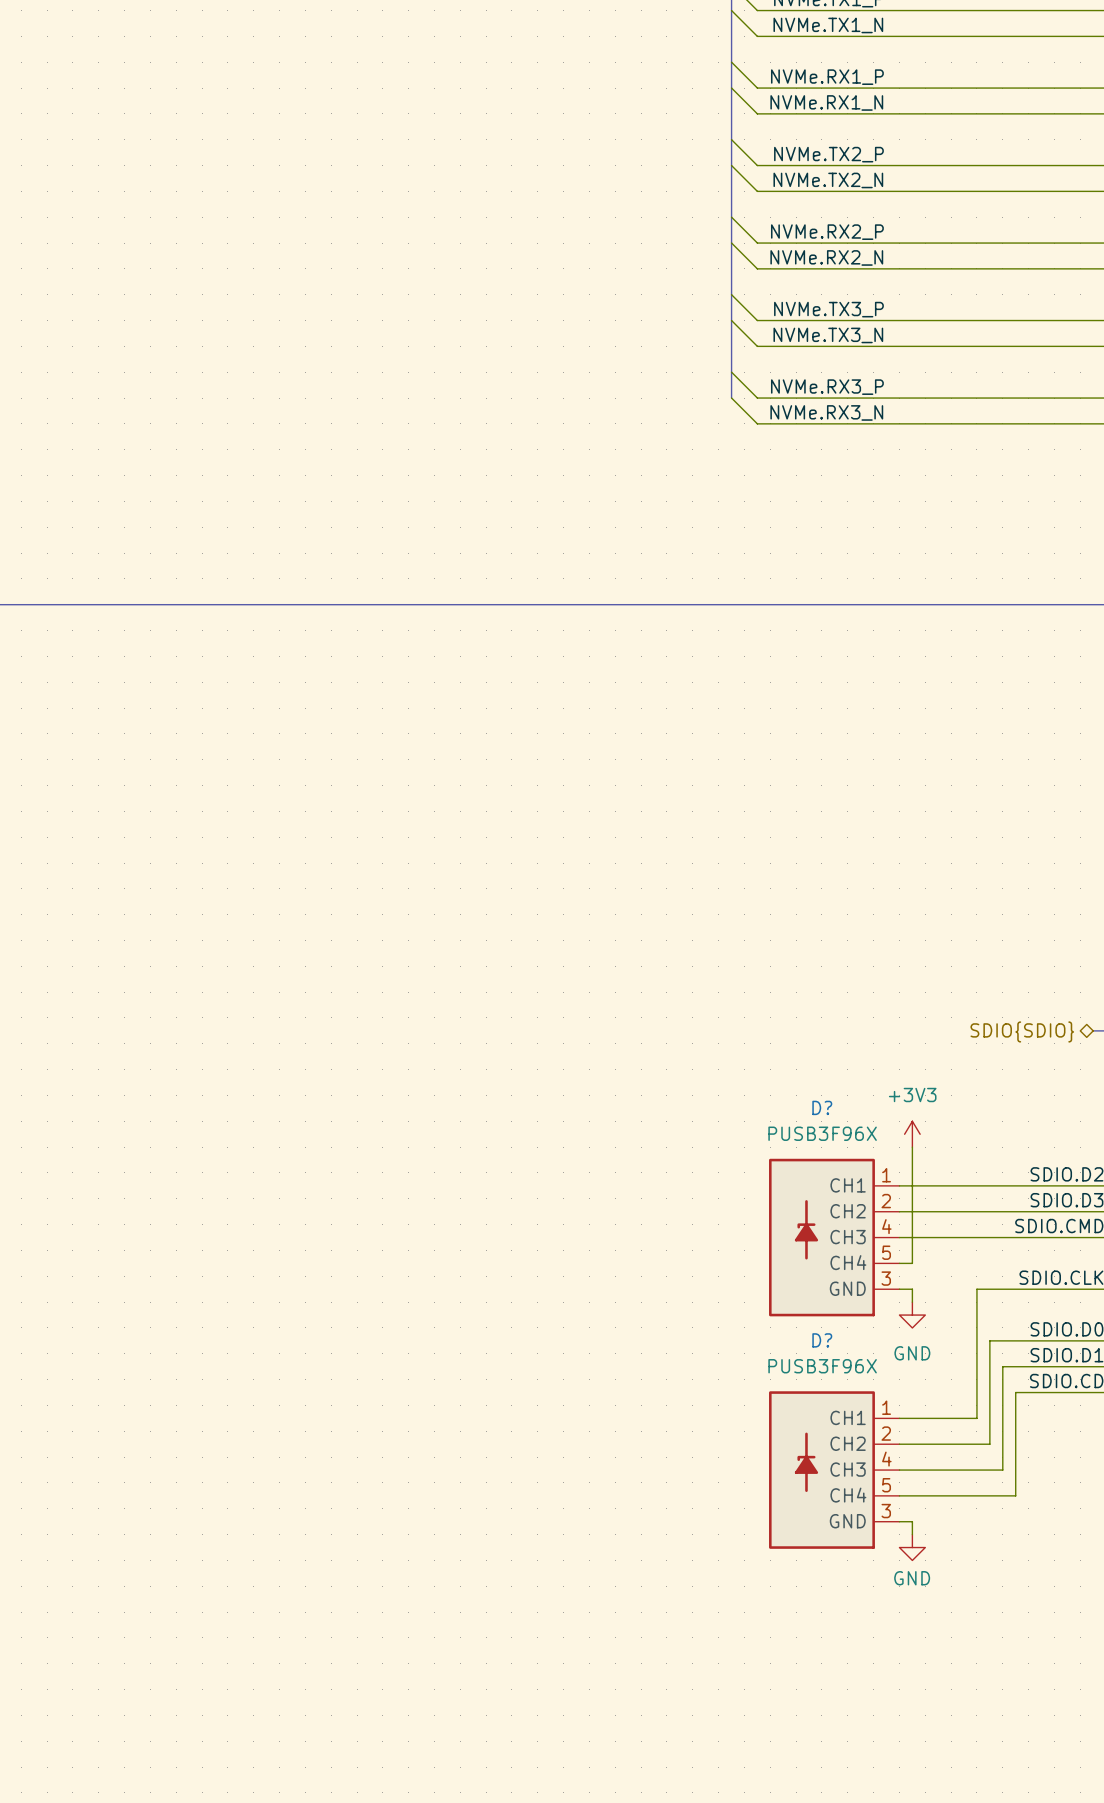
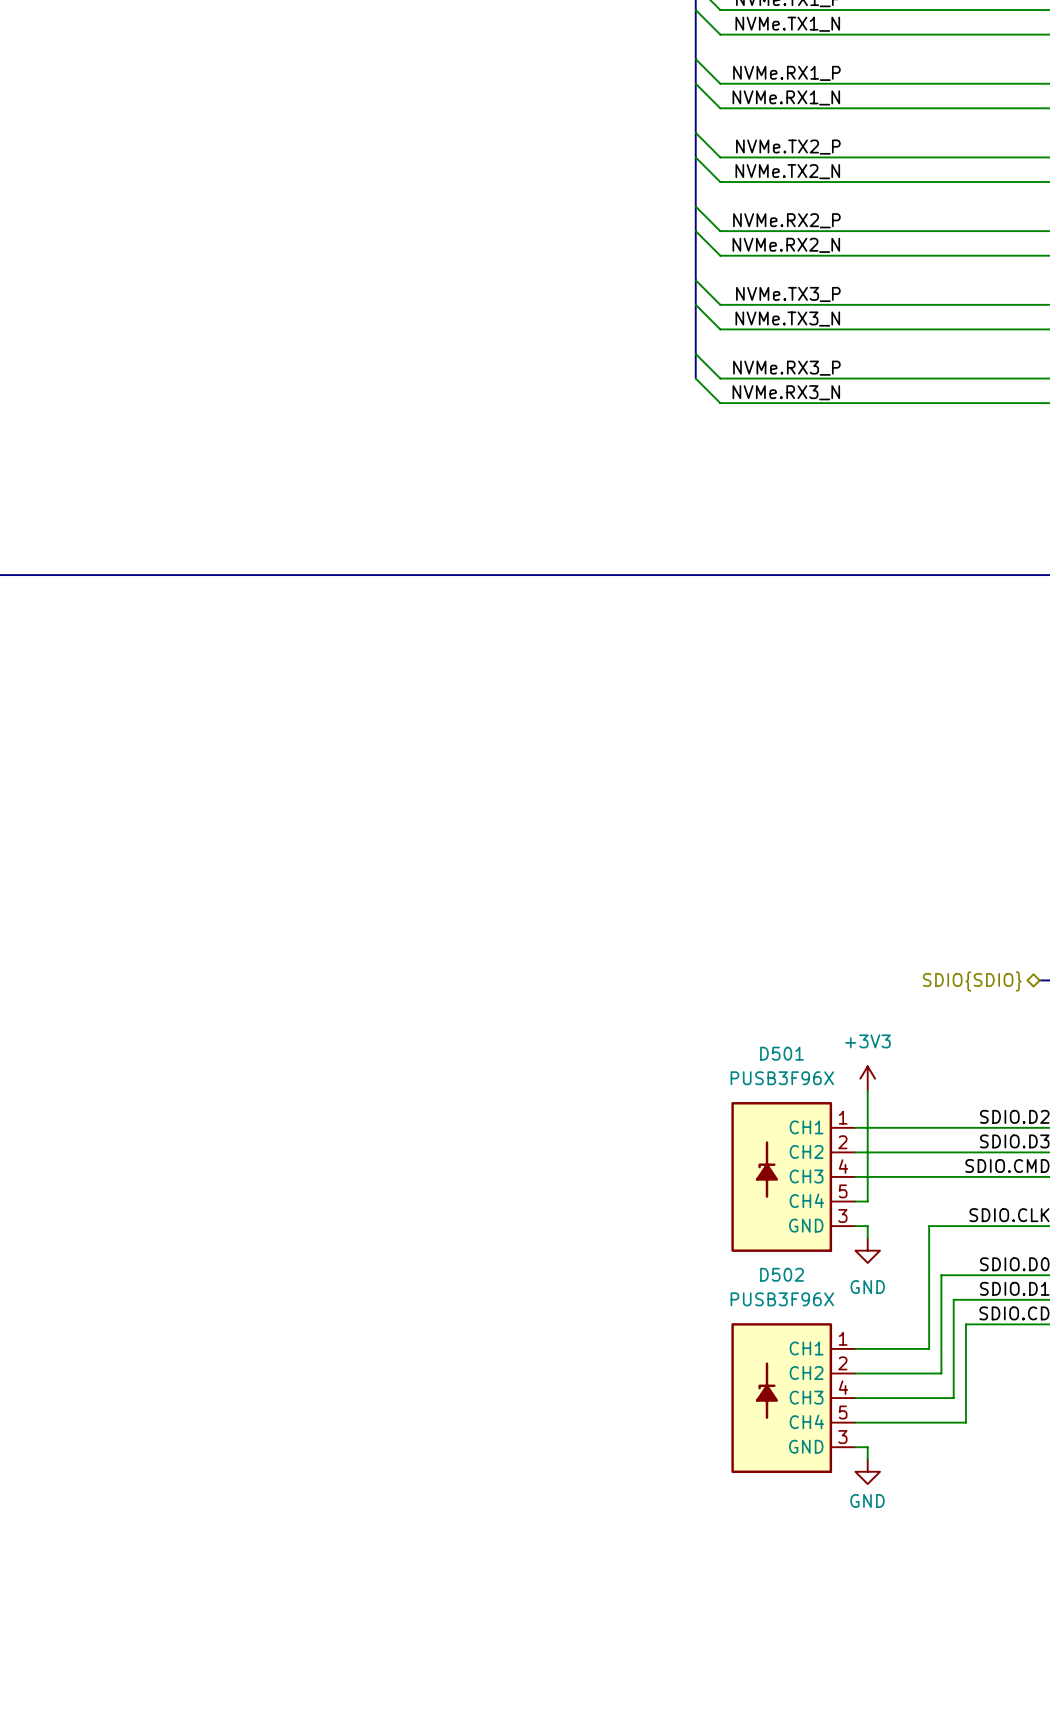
D? name: D? (822, 1107) -> D501 (782, 1053)
D? name: D? (822, 1340) -> D502 (782, 1274)

